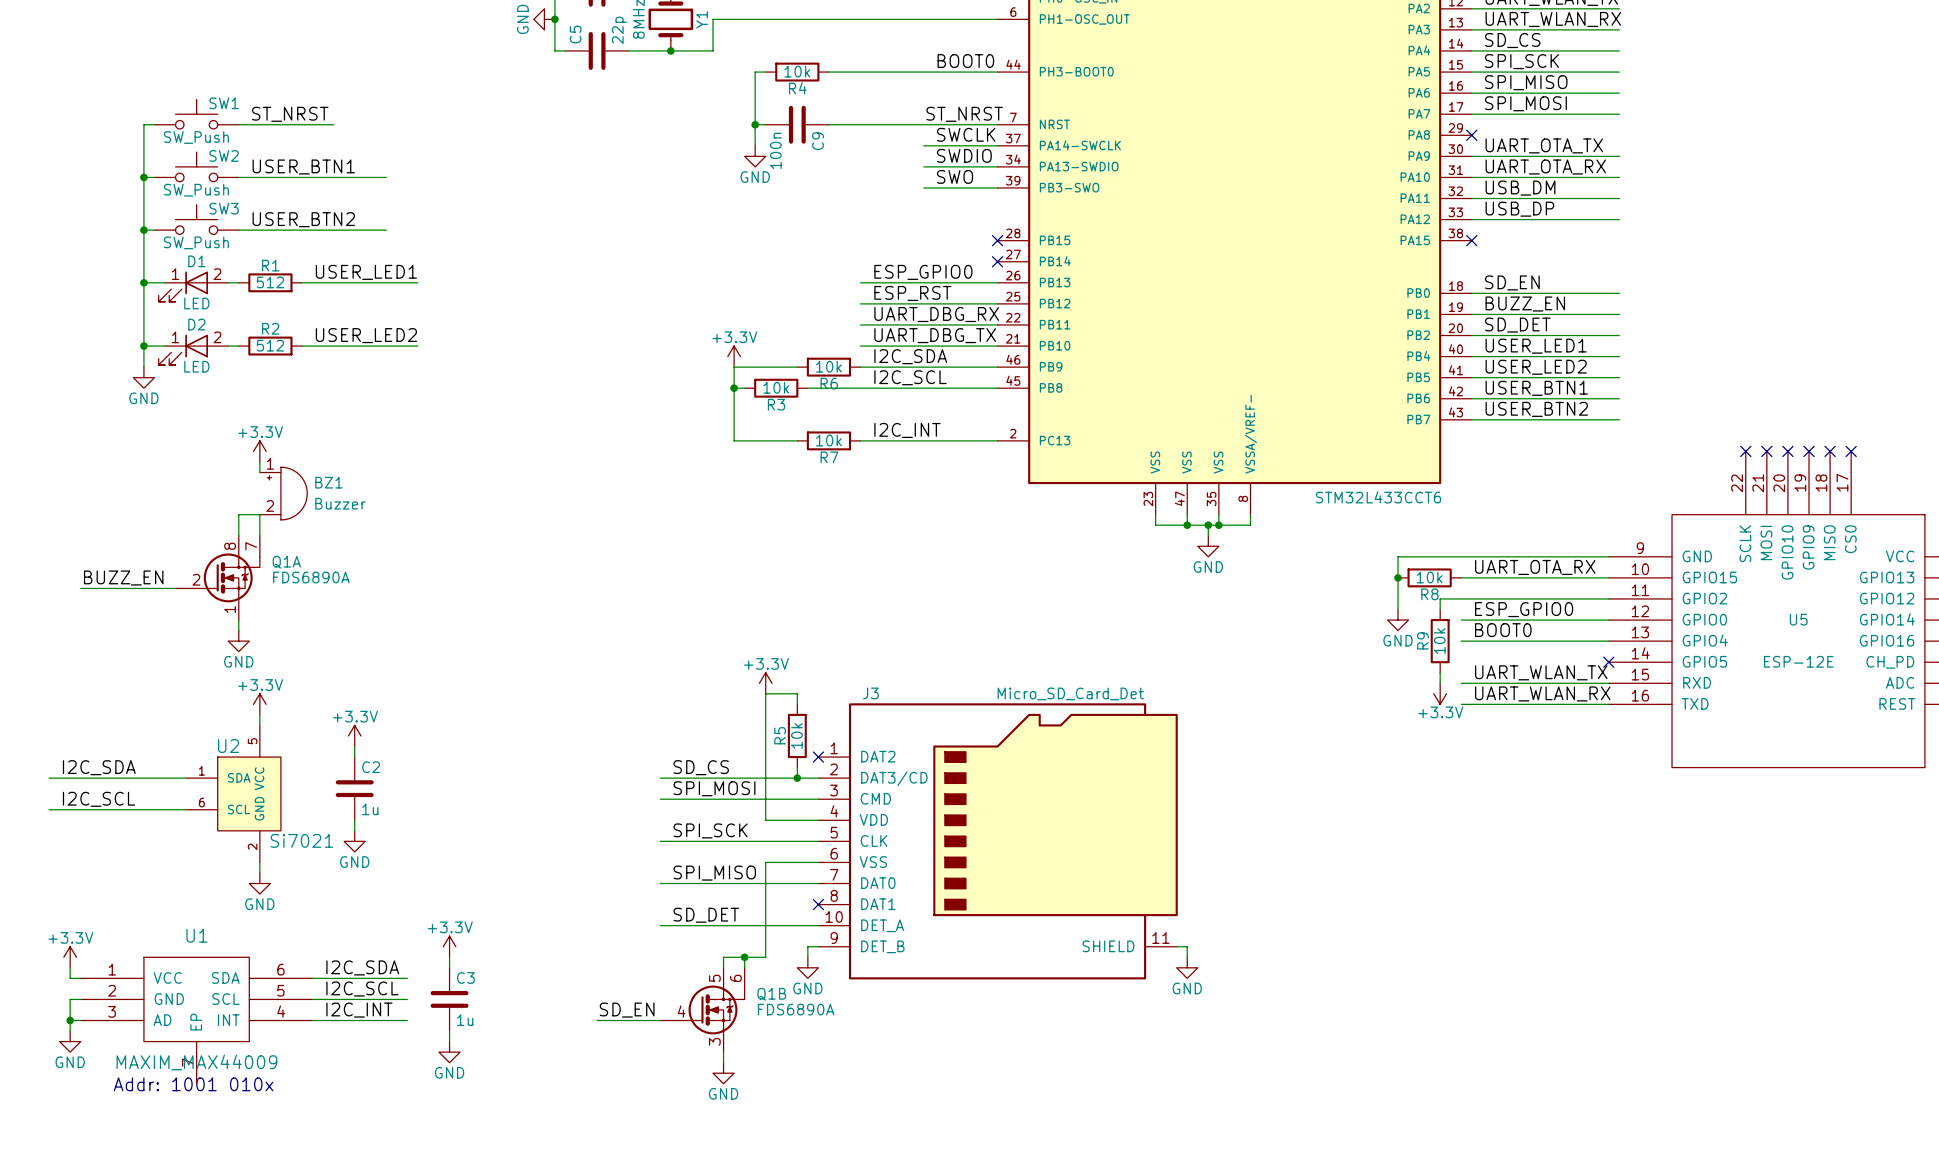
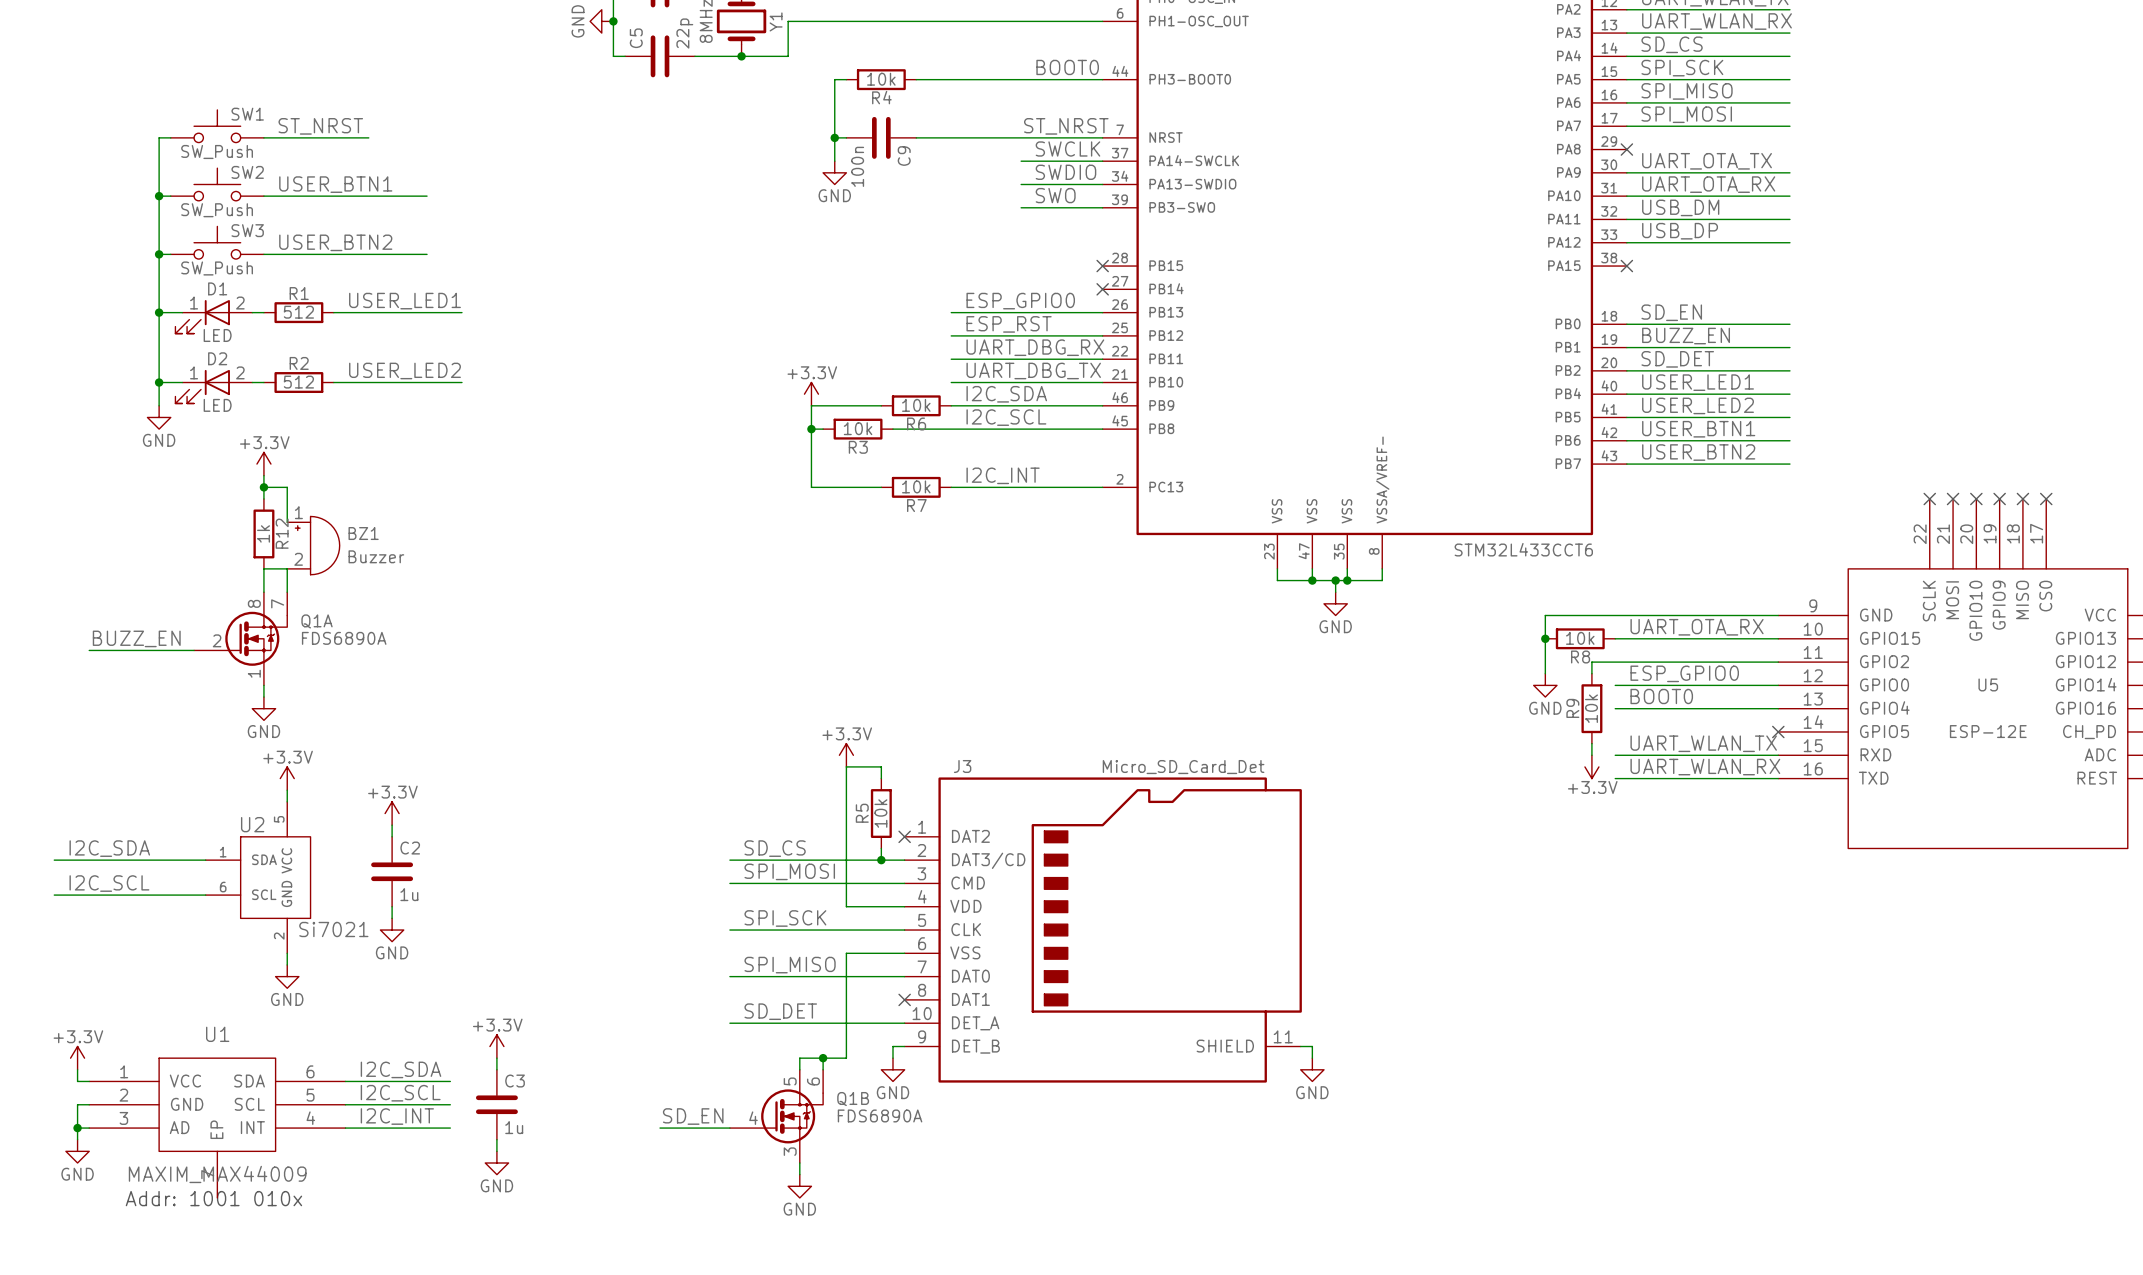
wire: none -> (263, 475) (263, 499)
wire: none -> (263, 487) (287, 487) (287, 510)
junction: none -> (263, 487)
power symbol position: +3.3V (259, 451) -> +3.3V (263, 464)
R12: none -> 1k (263, 533)

